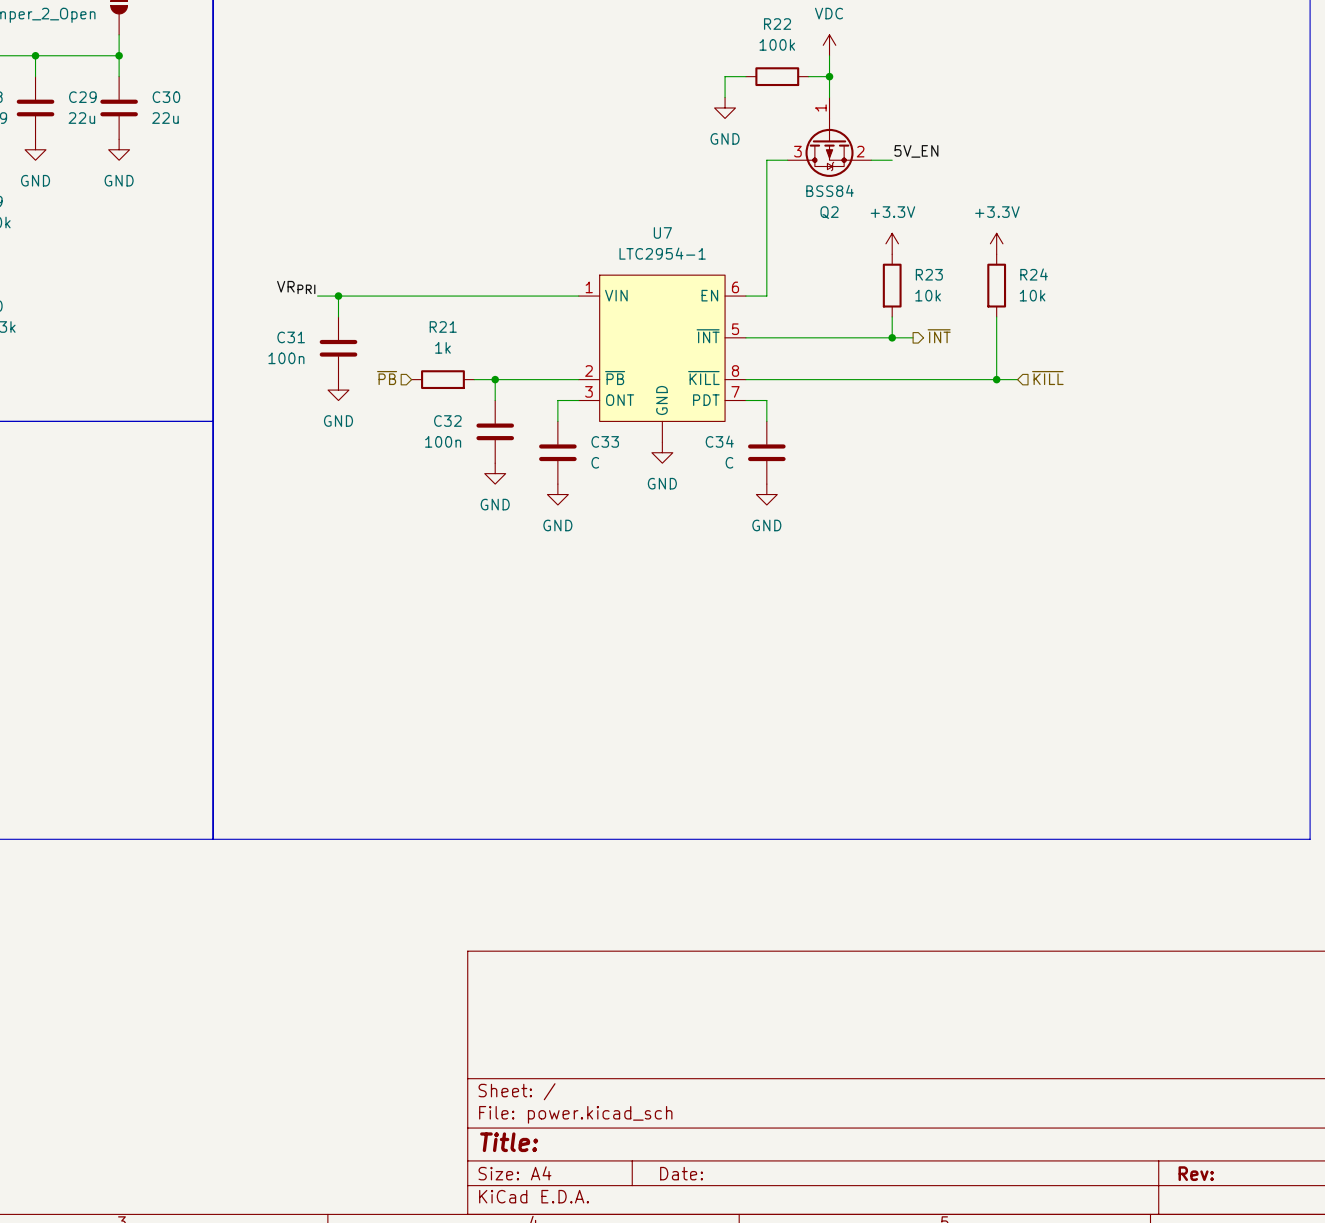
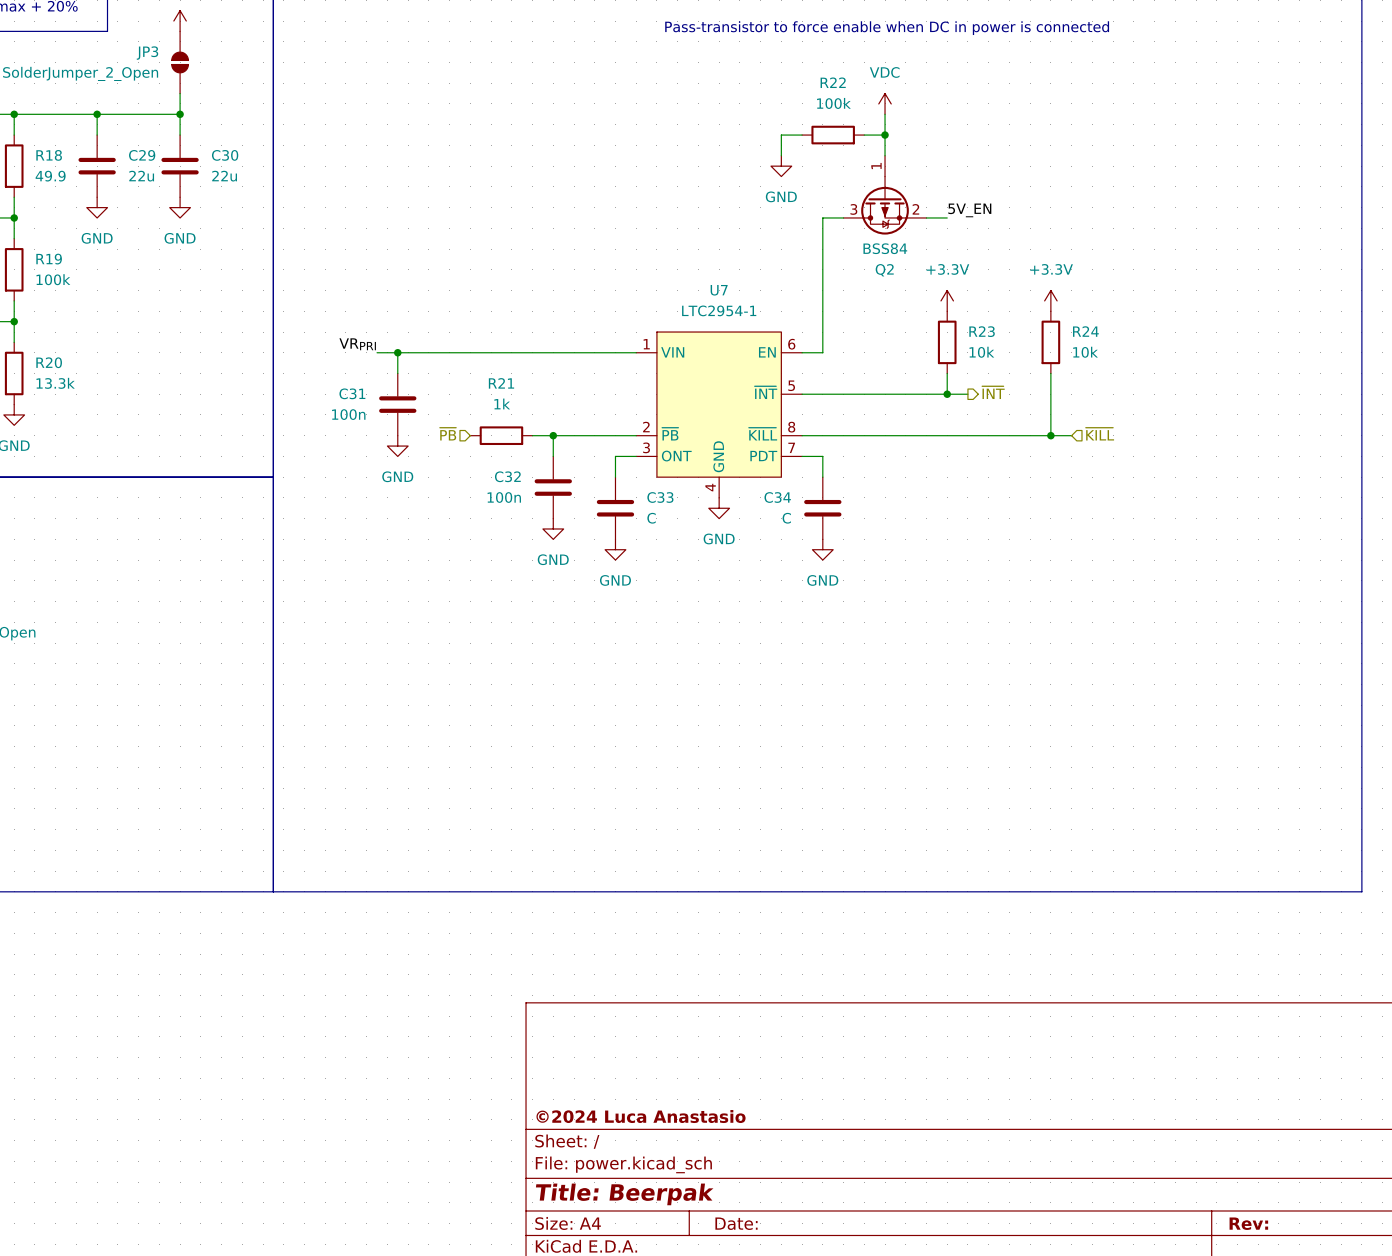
U7 pin number: none -> 4 (710, 487)
title block: none -> ©2024 Luca Anastasio (641, 1116)
title block: Title: (509, 1142) -> Title: Beerpak (624, 1194)

